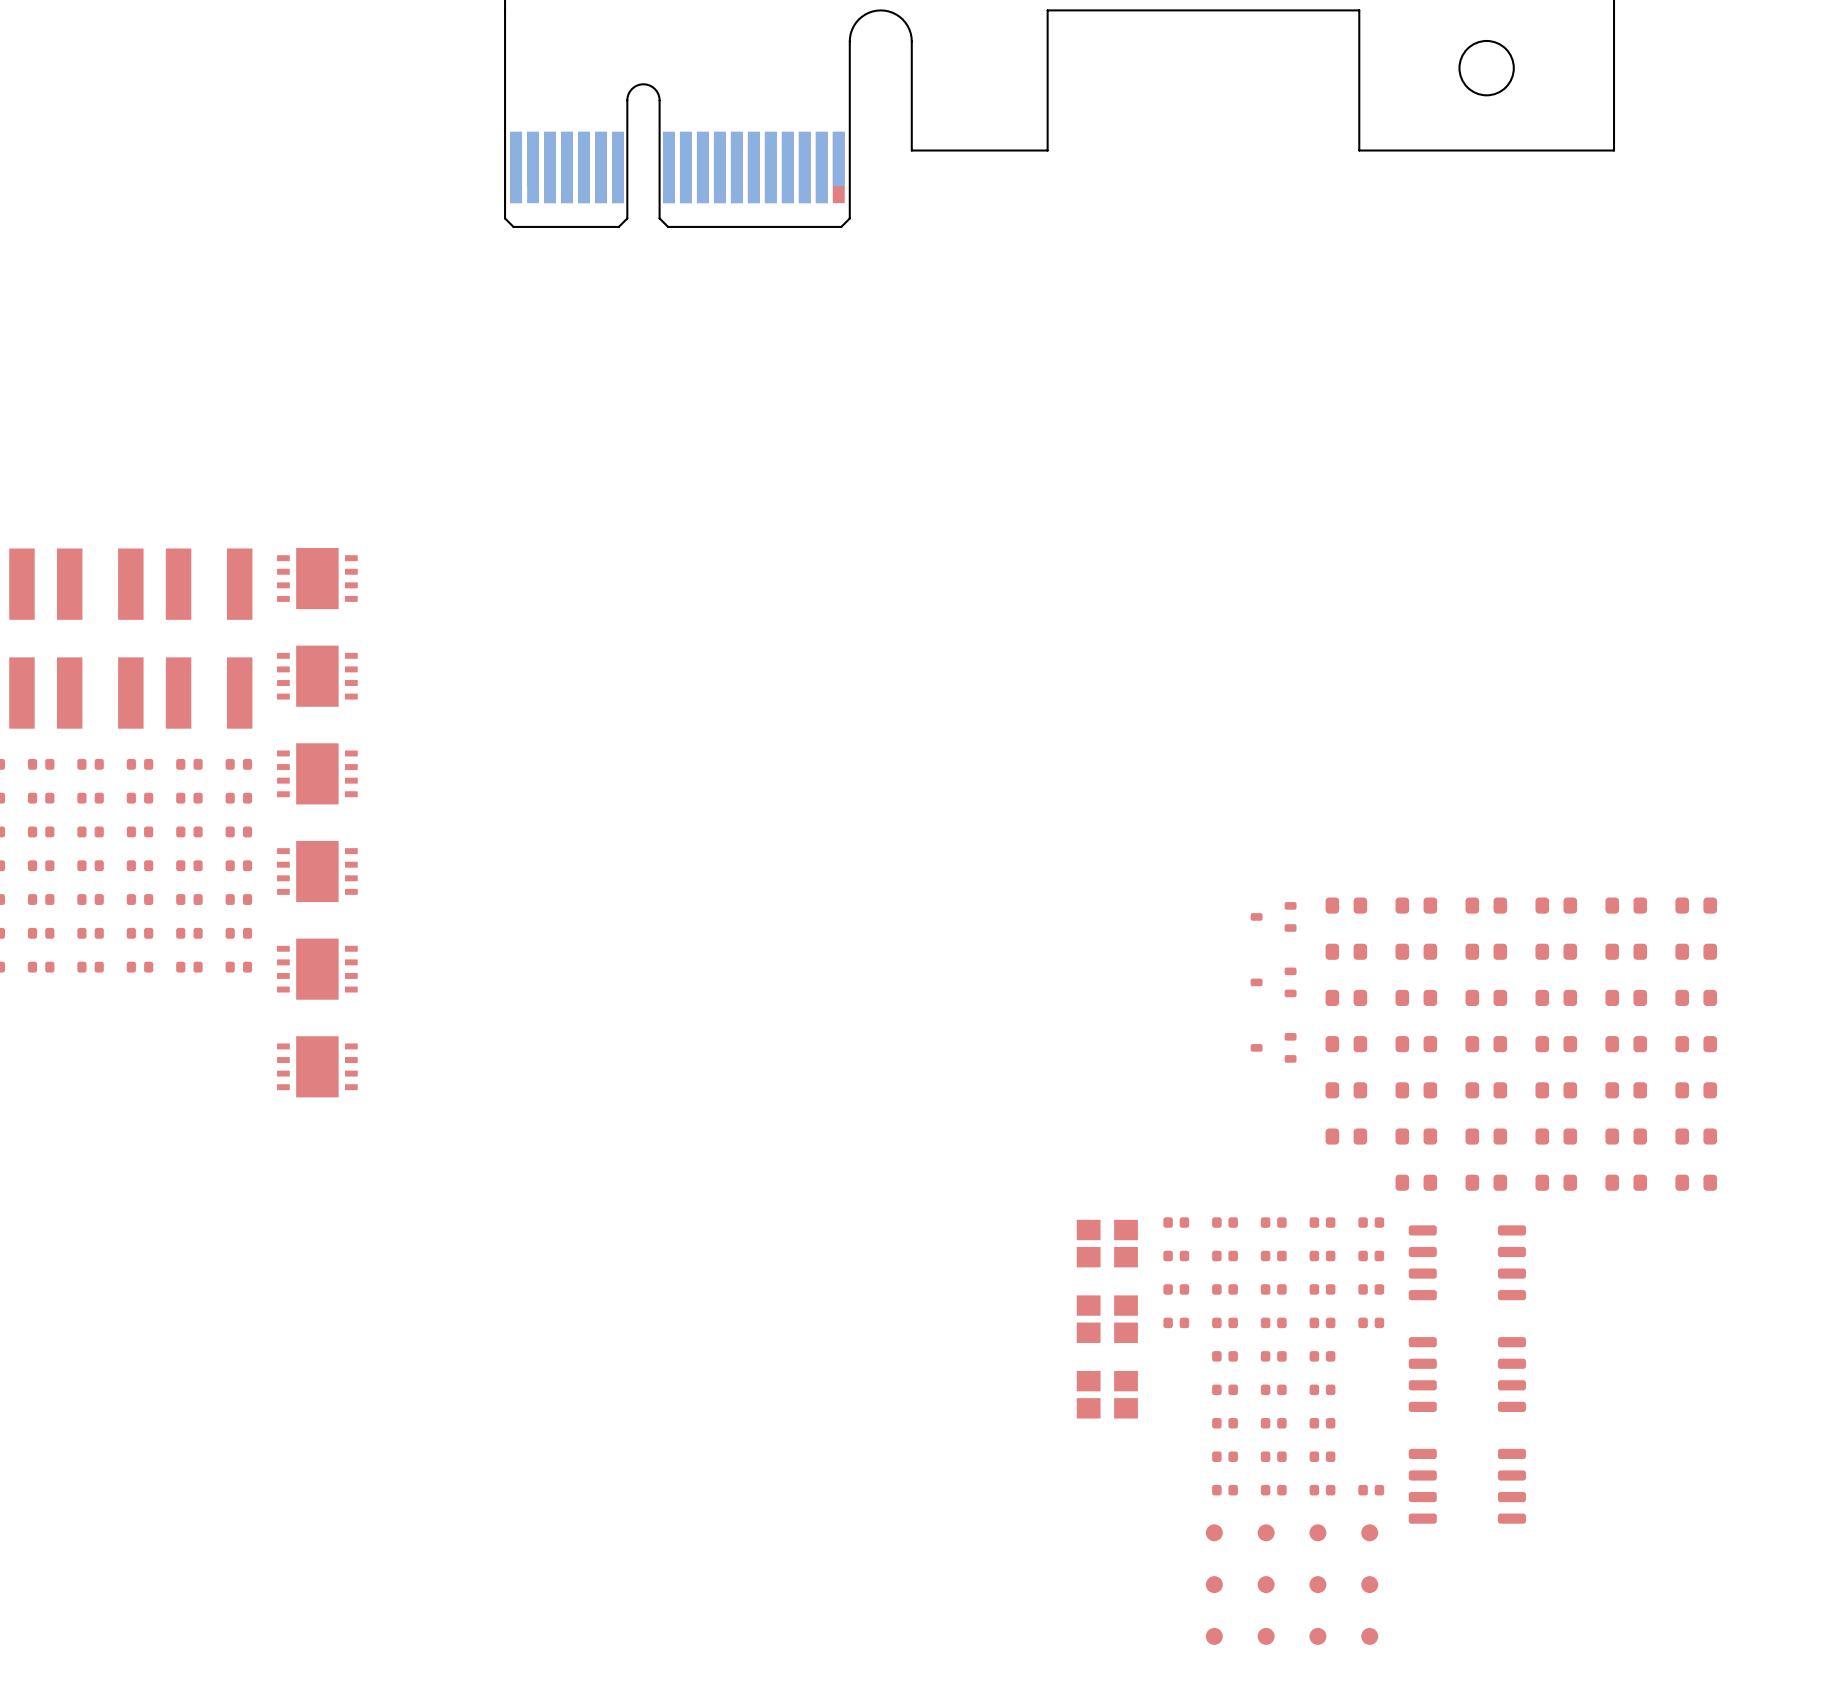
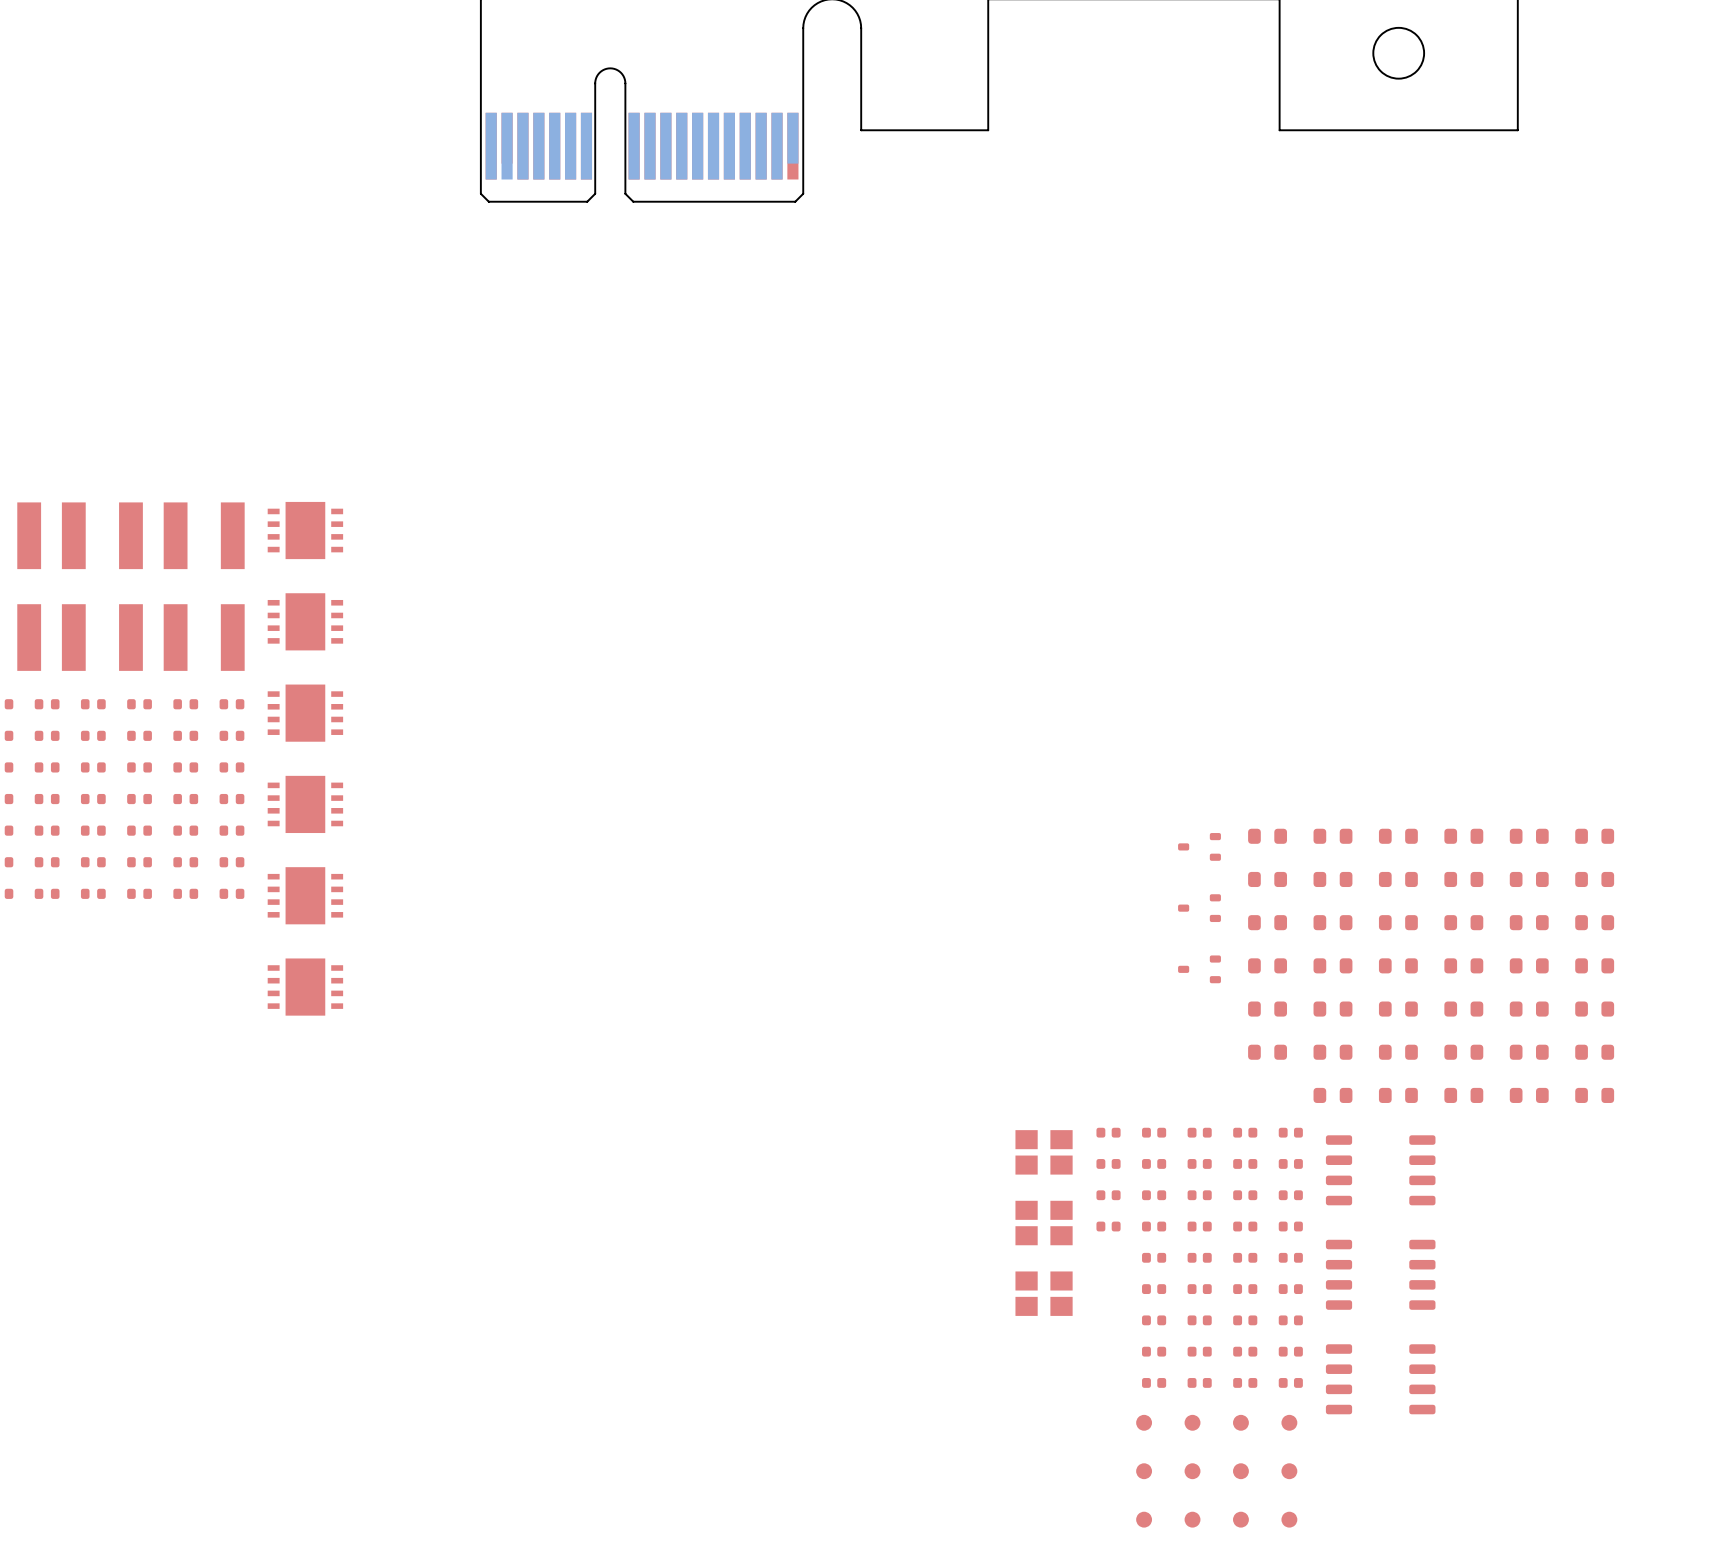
part: none -> (1290, 1257)
part: none -> (1290, 1289)
part: none -> (1290, 1320)
part: none -> (1290, 1351)

